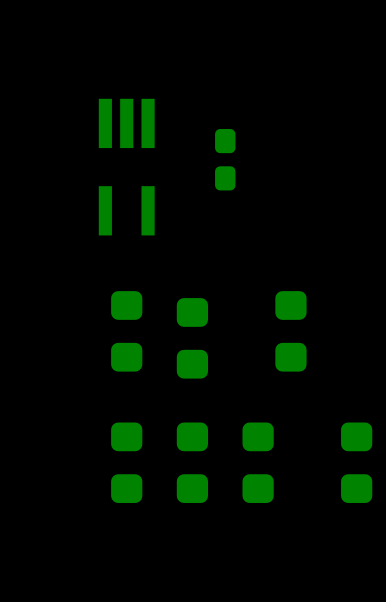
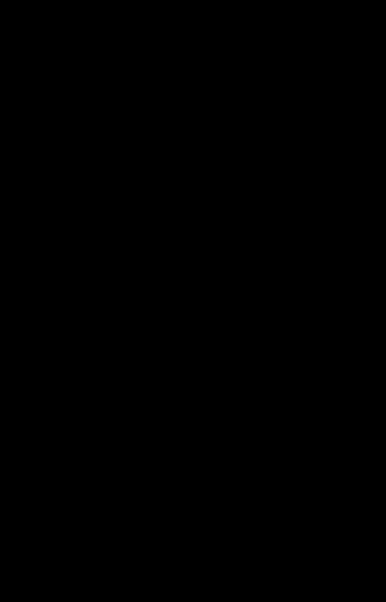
part: (225, 159) -> none
part: (126, 167) -> none
part: (126, 331) -> none
part: (290, 331) -> none
part: (192, 338) -> none
part: (126, 462) -> none
part: (192, 462) -> none
part: (258, 462) -> none
part: (356, 462) -> none

